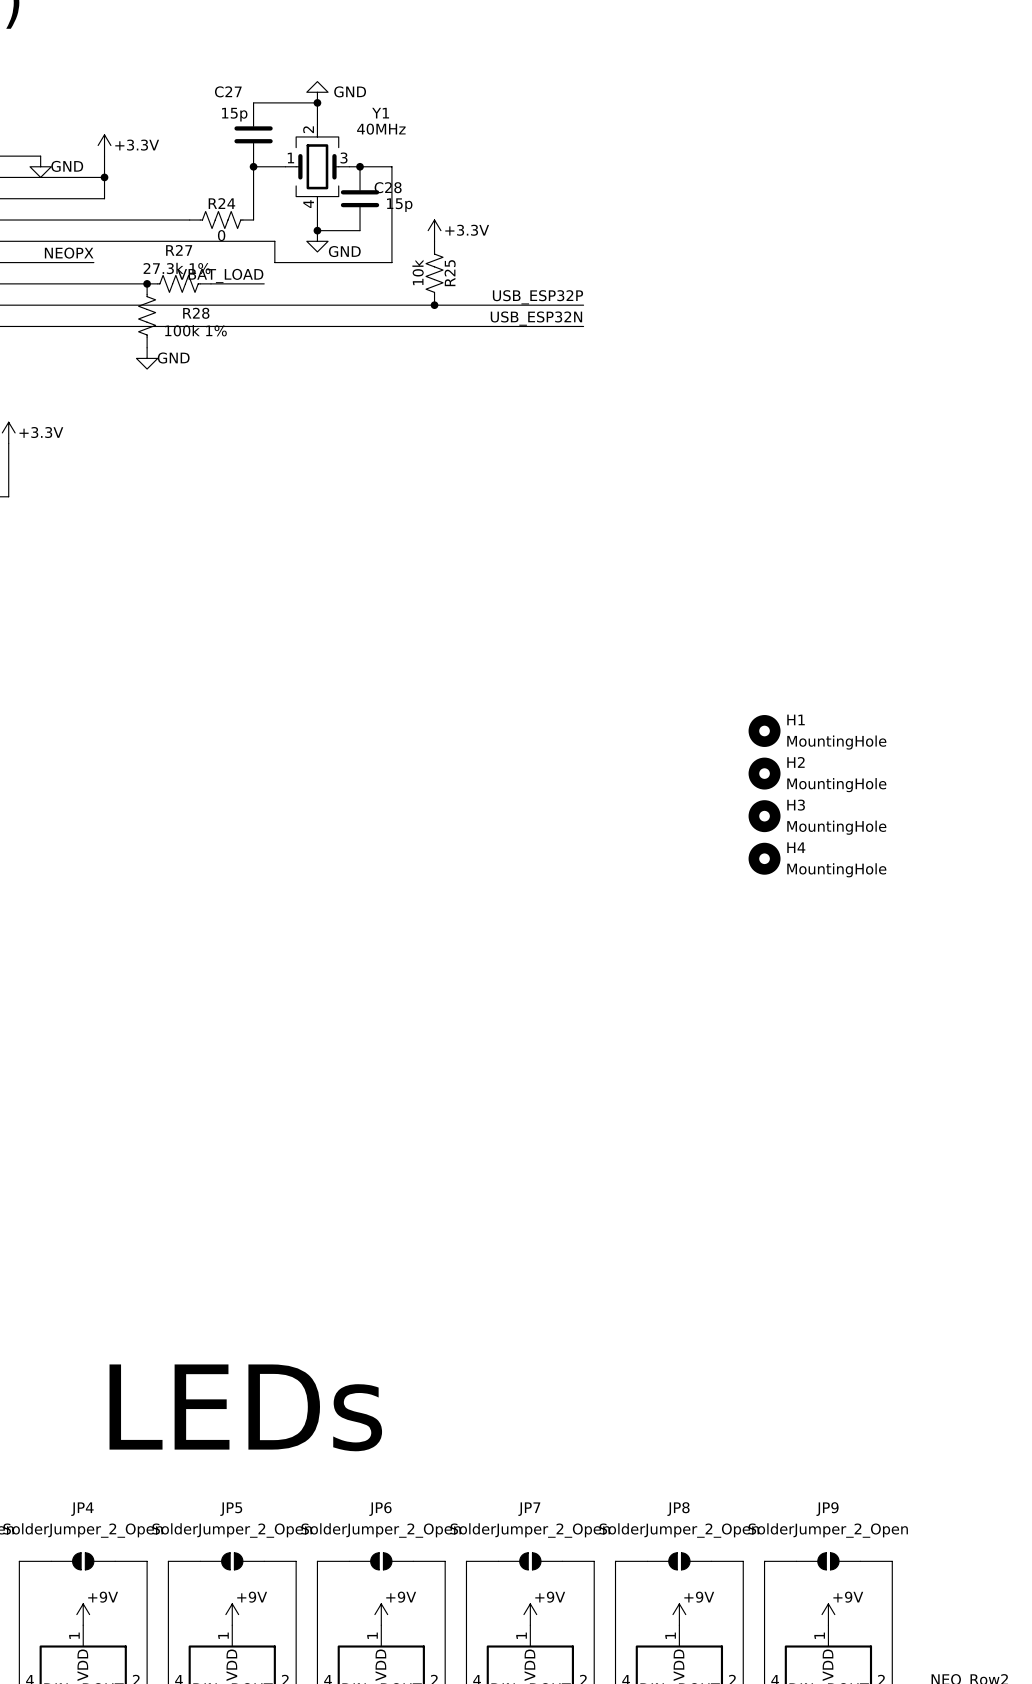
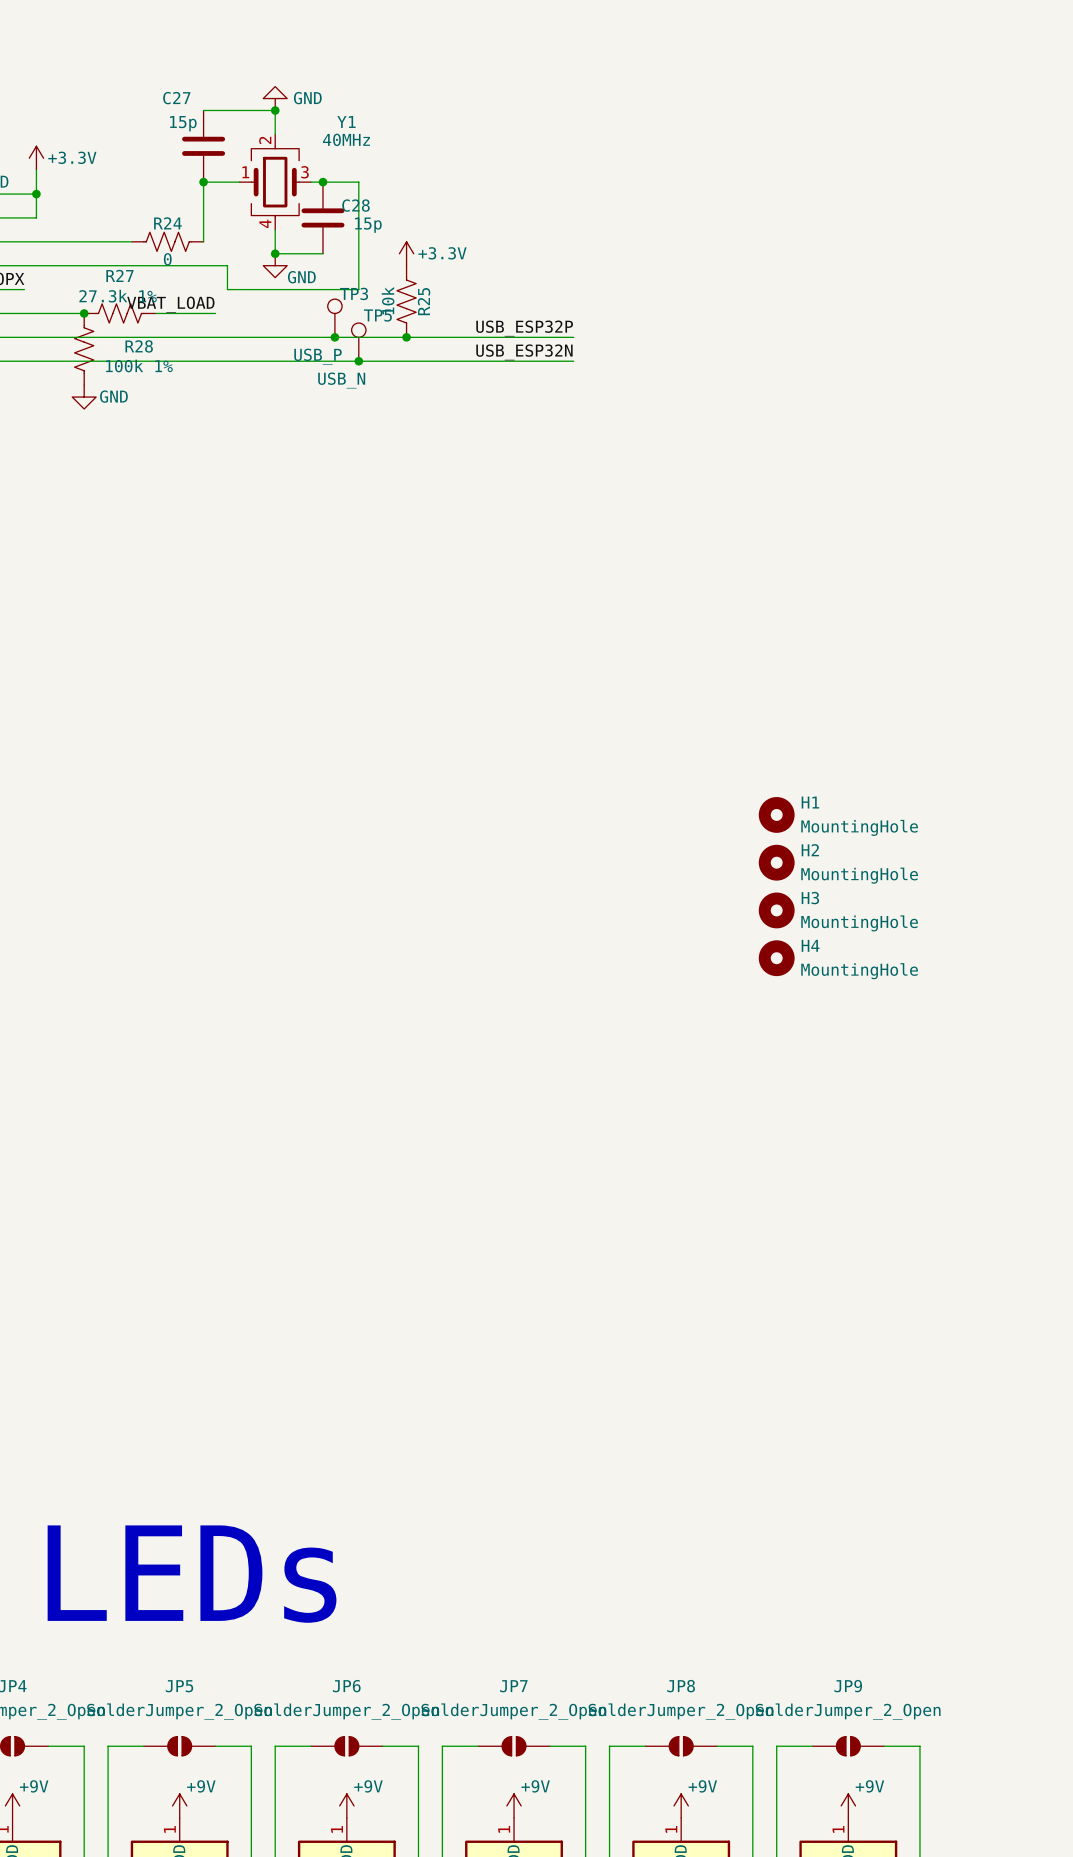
TP3: none -> USB_P (334, 318)
junction: none -> (334, 337)
TP5: none -> USB_N (358, 342)
junction: none -> (358, 361)

